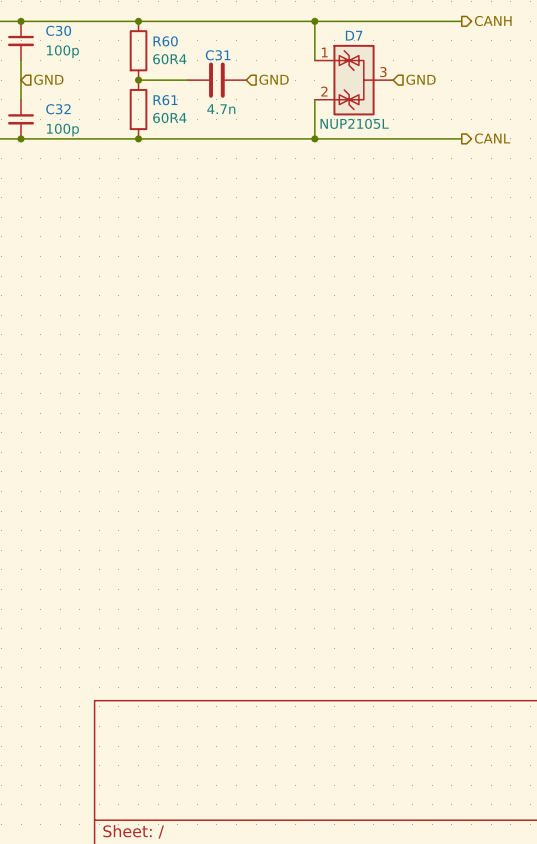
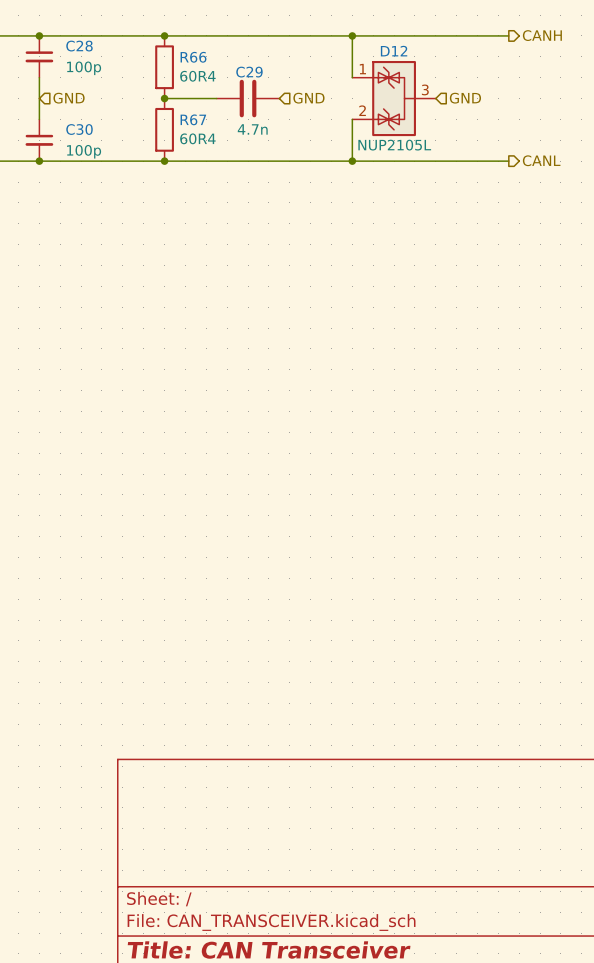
C30 name: C30 (58, 30) -> C28 (79, 46)
D7 name: D7 (354, 35) -> D12 (394, 51)
R60 name: R60 (165, 41) -> R66 (193, 57)
C31 name: C31 (218, 55) -> C29 (249, 72)
R61 name: R61 (165, 100) -> R67 (193, 119)
C32 name: C32 (58, 109) -> C30 (79, 129)

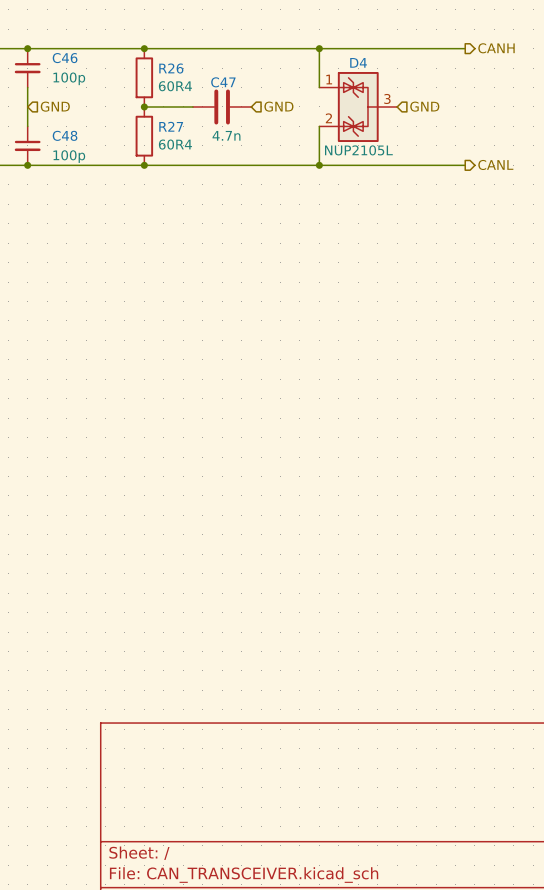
C28 name: C28 (79, 46) -> C46 (65, 58)
D12 name: D12 (394, 51) -> D4 (358, 62)
R66 name: R66 (193, 57) -> R26 (171, 68)
C29 name: C29 (249, 72) -> C47 (223, 82)
R67 name: R67 (193, 119) -> R27 (171, 126)
C30 name: C30 (79, 129) -> C48 (65, 135)

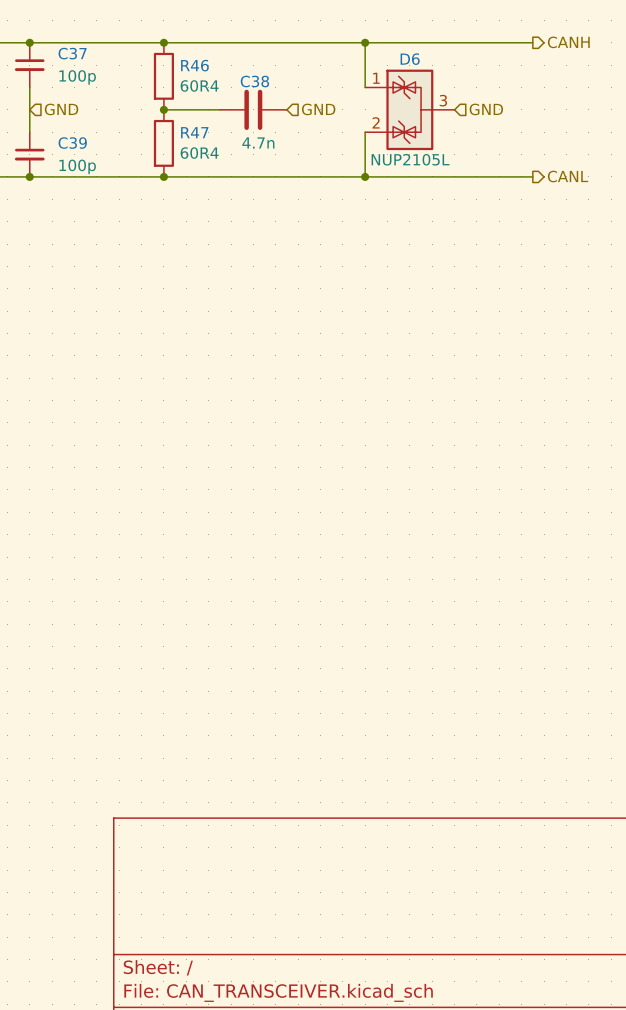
C46 name: C46 (65, 58) -> C37 (72, 53)
D4 name: D4 (358, 62) -> D6 (410, 59)
R26 name: R26 (171, 68) -> R46 (194, 65)
C47 name: C47 (223, 82) -> C38 (254, 81)
R27 name: R27 (171, 126) -> R47 (194, 132)
C48 name: C48 (65, 135) -> C39 (72, 143)

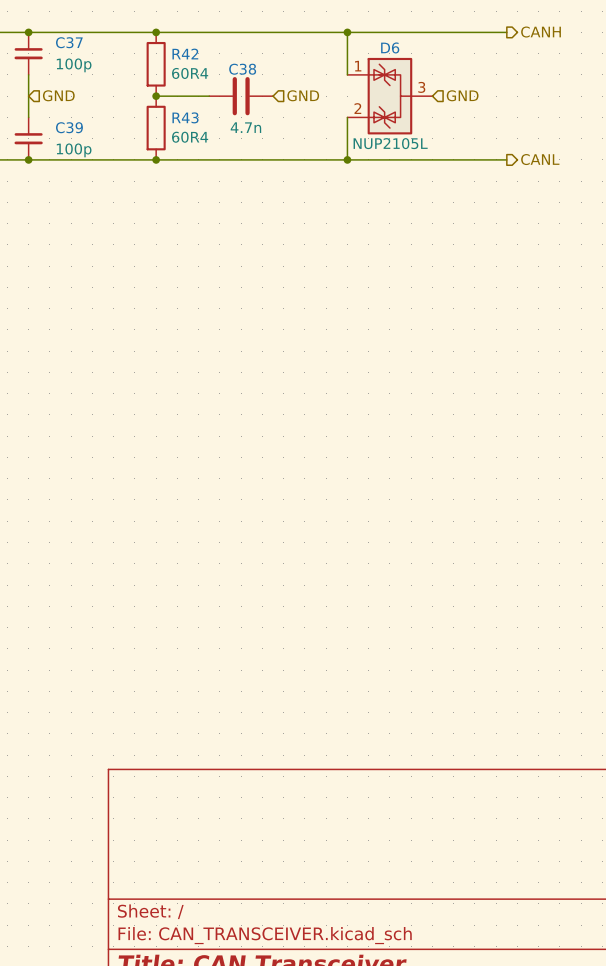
R46 name: R46 (194, 65) -> R42 (185, 54)
R47 name: R47 (194, 132) -> R43 (185, 117)

